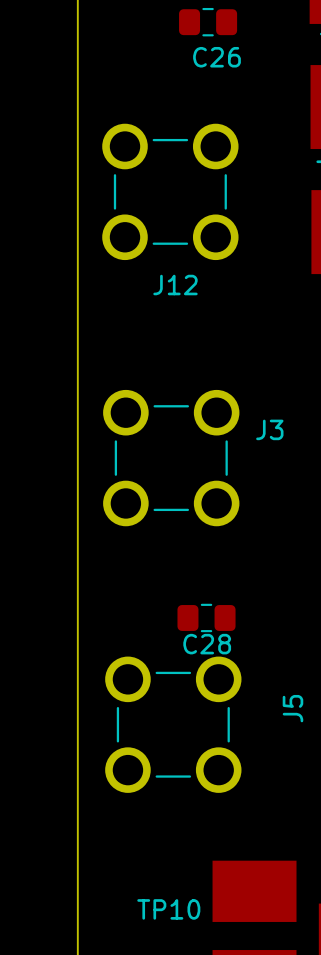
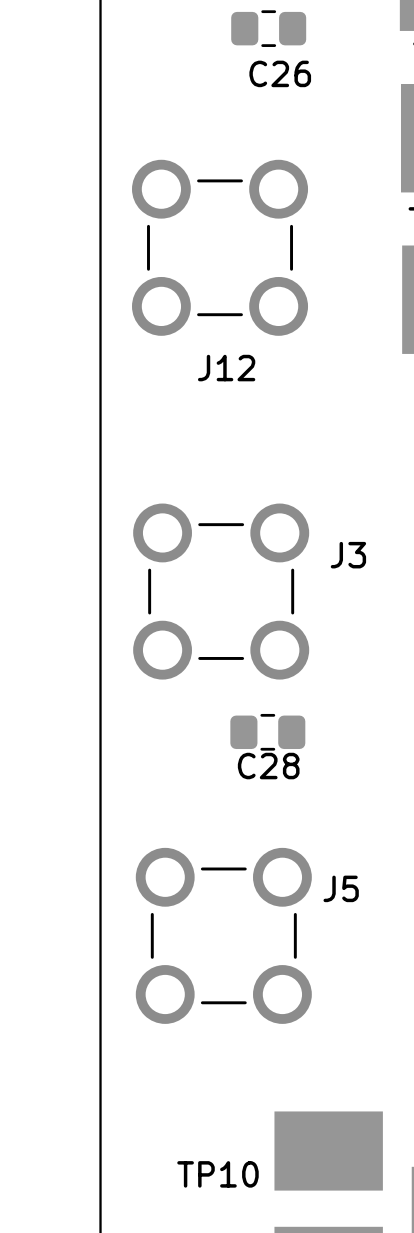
C28 position: (206, 617) -> (267, 732)
J5 name rotation: 0° (292, 708) -> 90° clockwise (341, 888)

